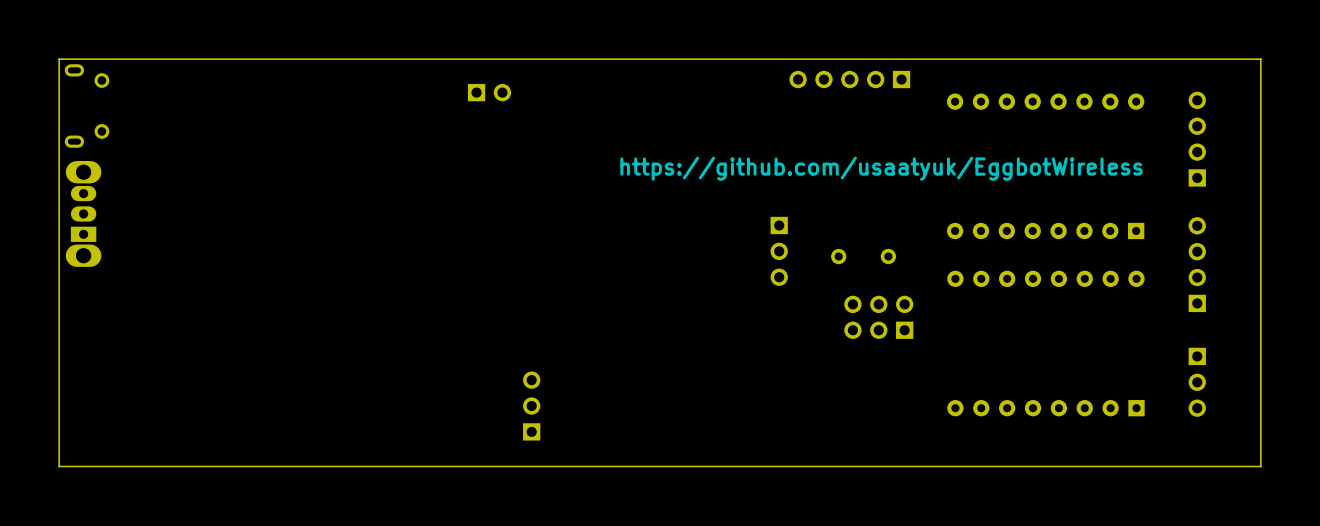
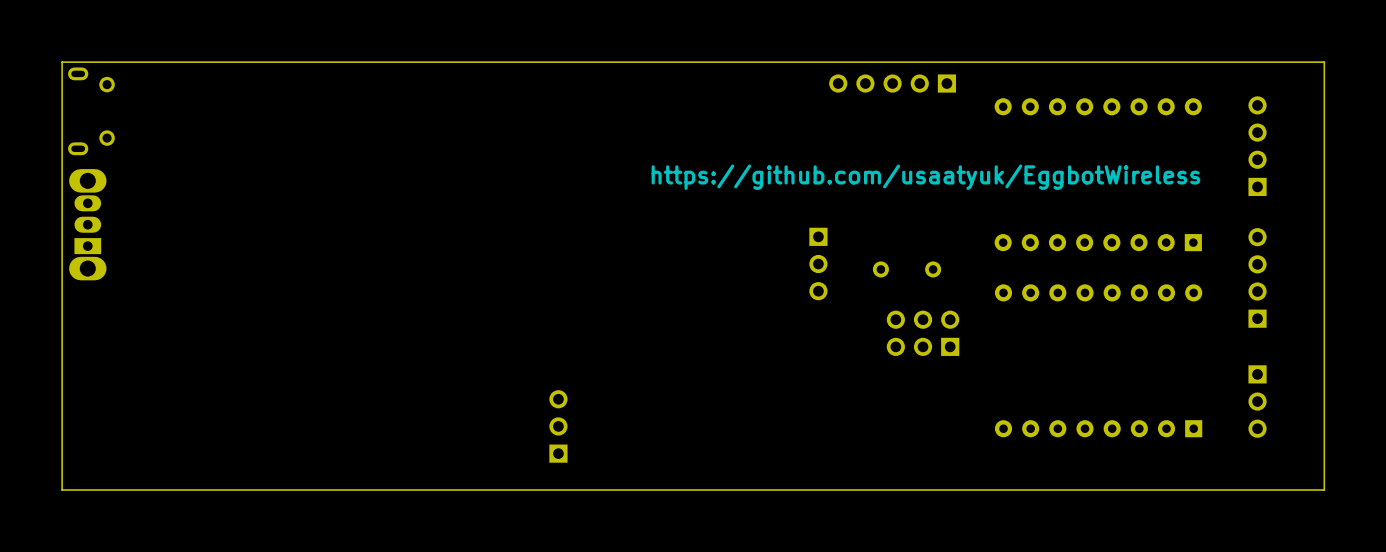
part: (489, 92) -> none

